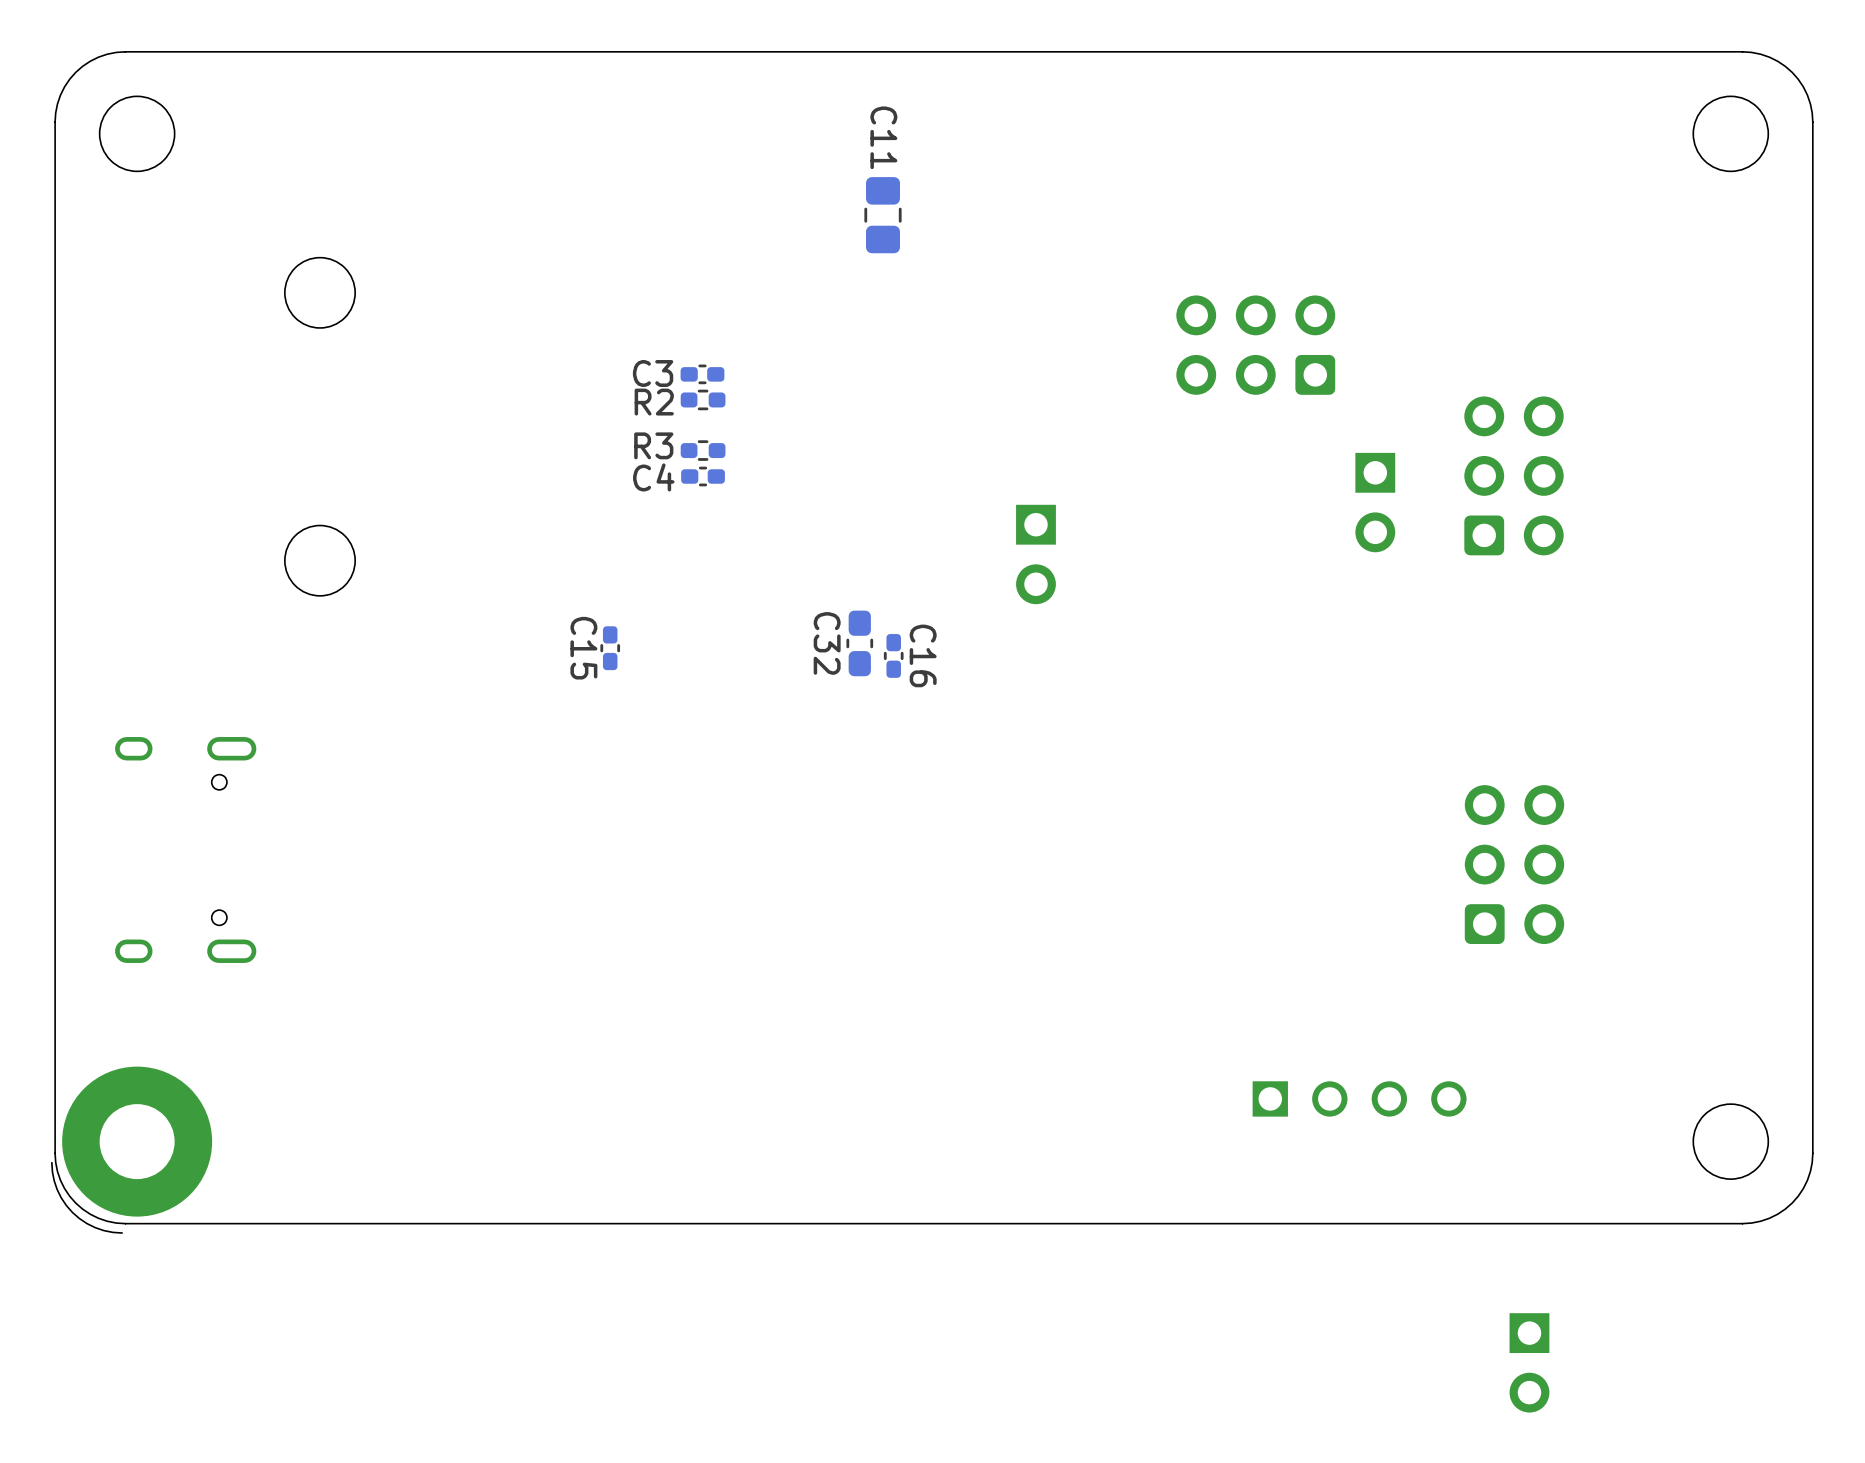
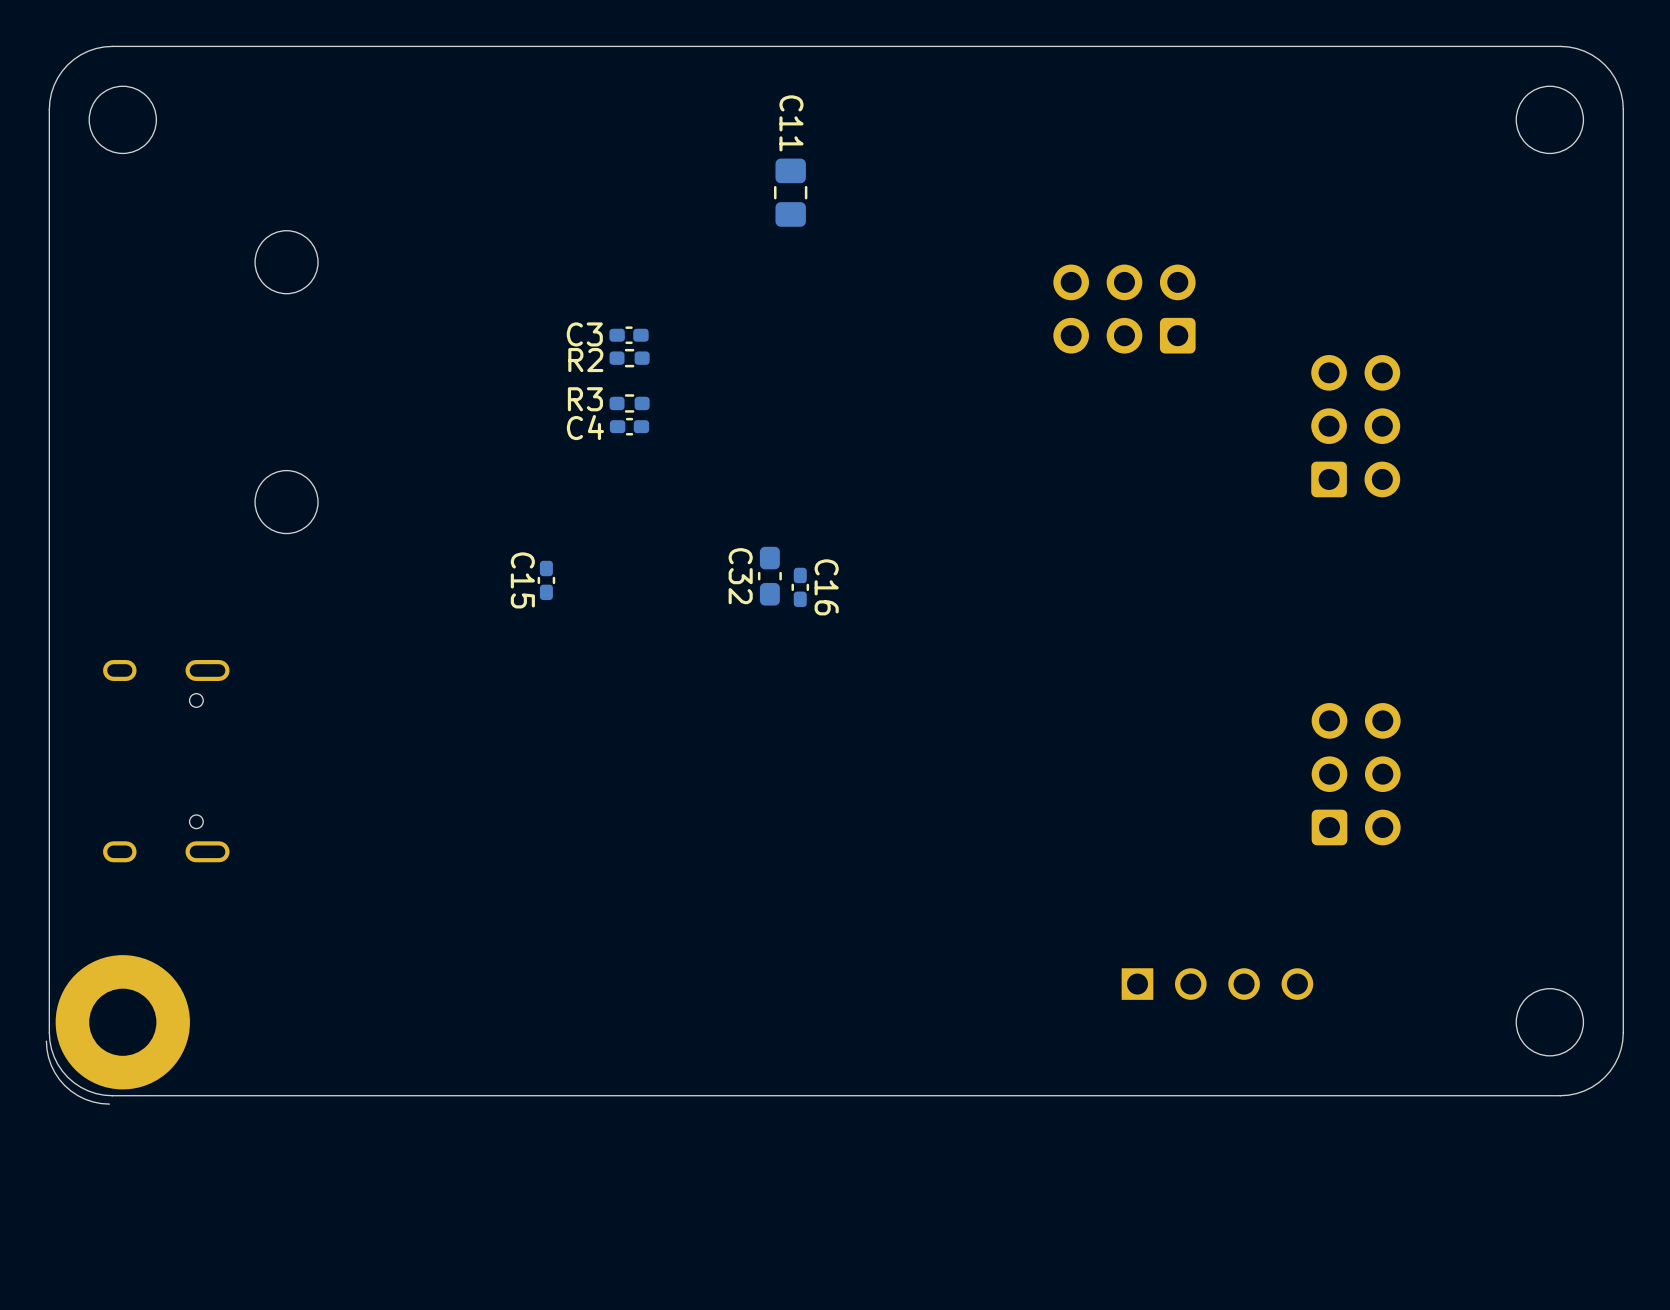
part: (1375, 502) -> none
part: (1035, 554) -> none
part: (1529, 1362) -> none

